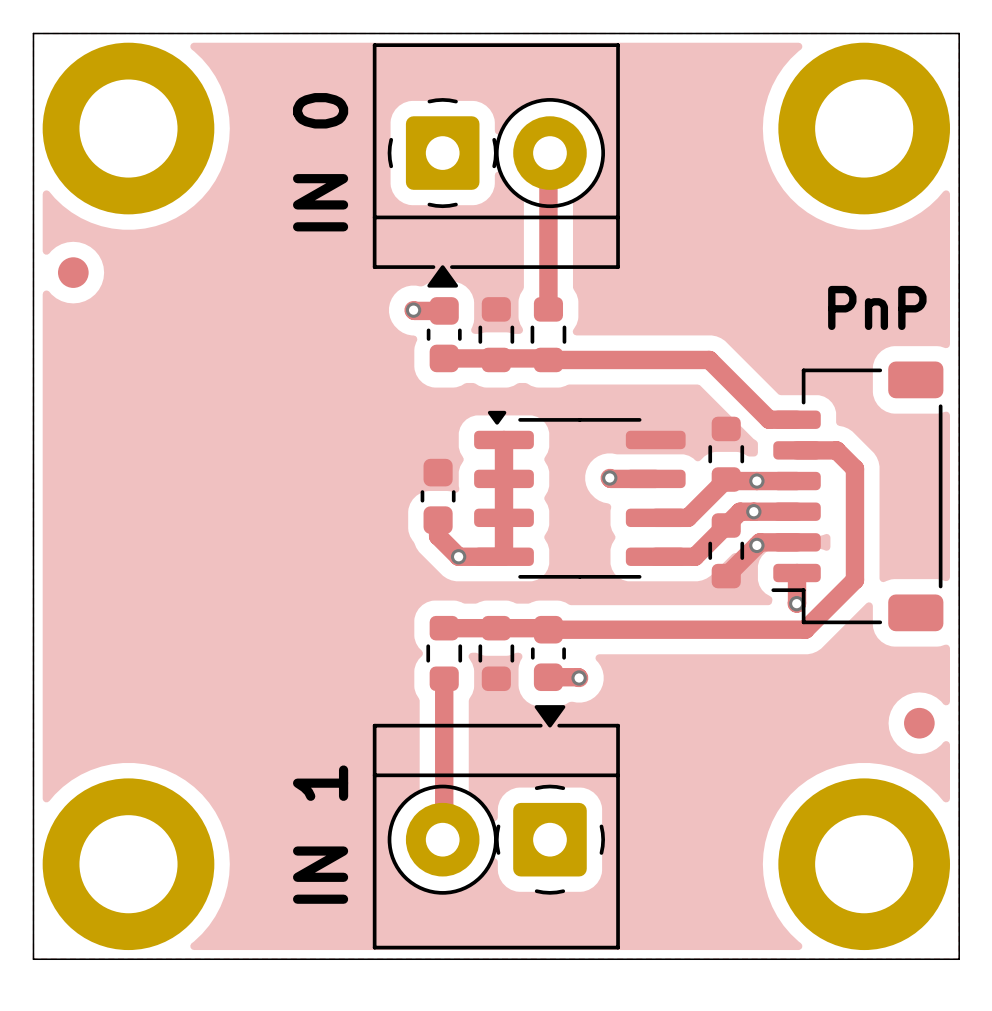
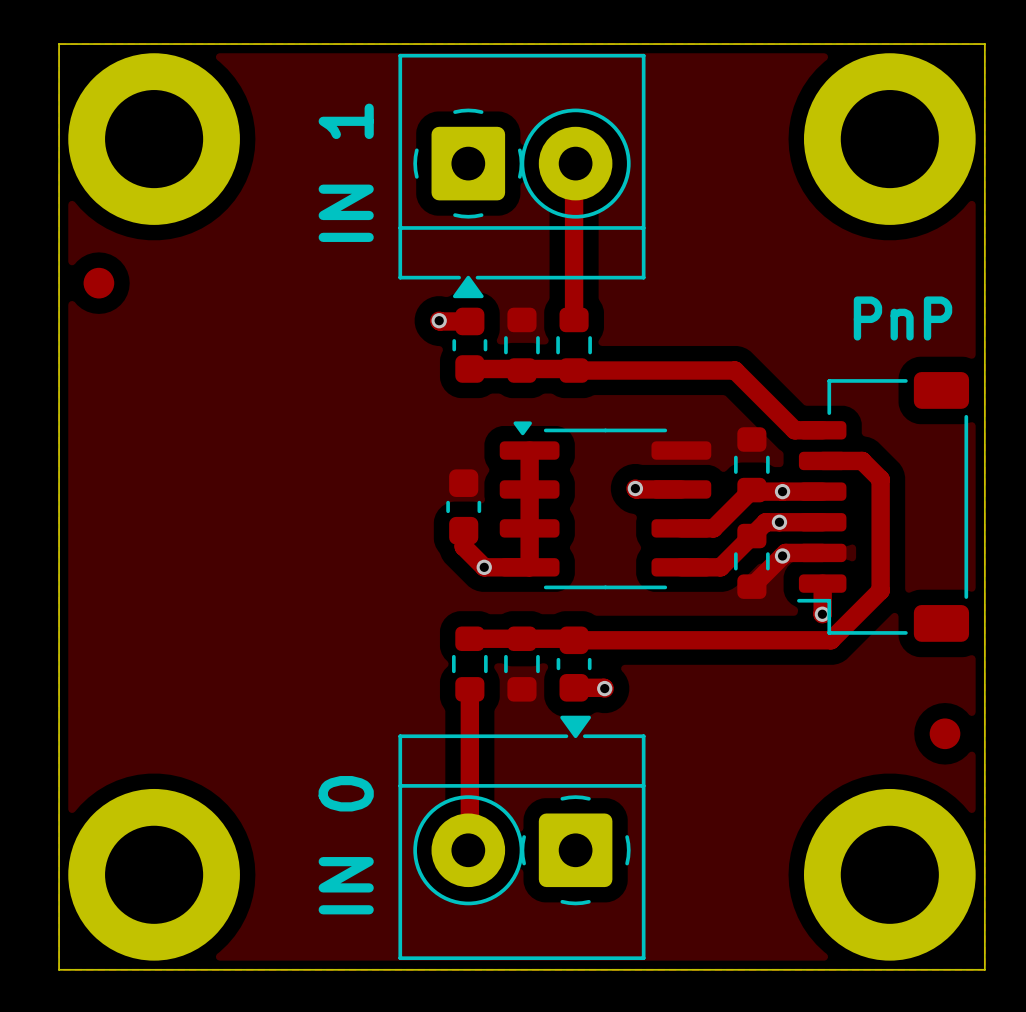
text: IN 0 (320, 162) -> IN 1 (346, 172)
text: IN 1 (320, 834) -> IN 0 (346, 845)

